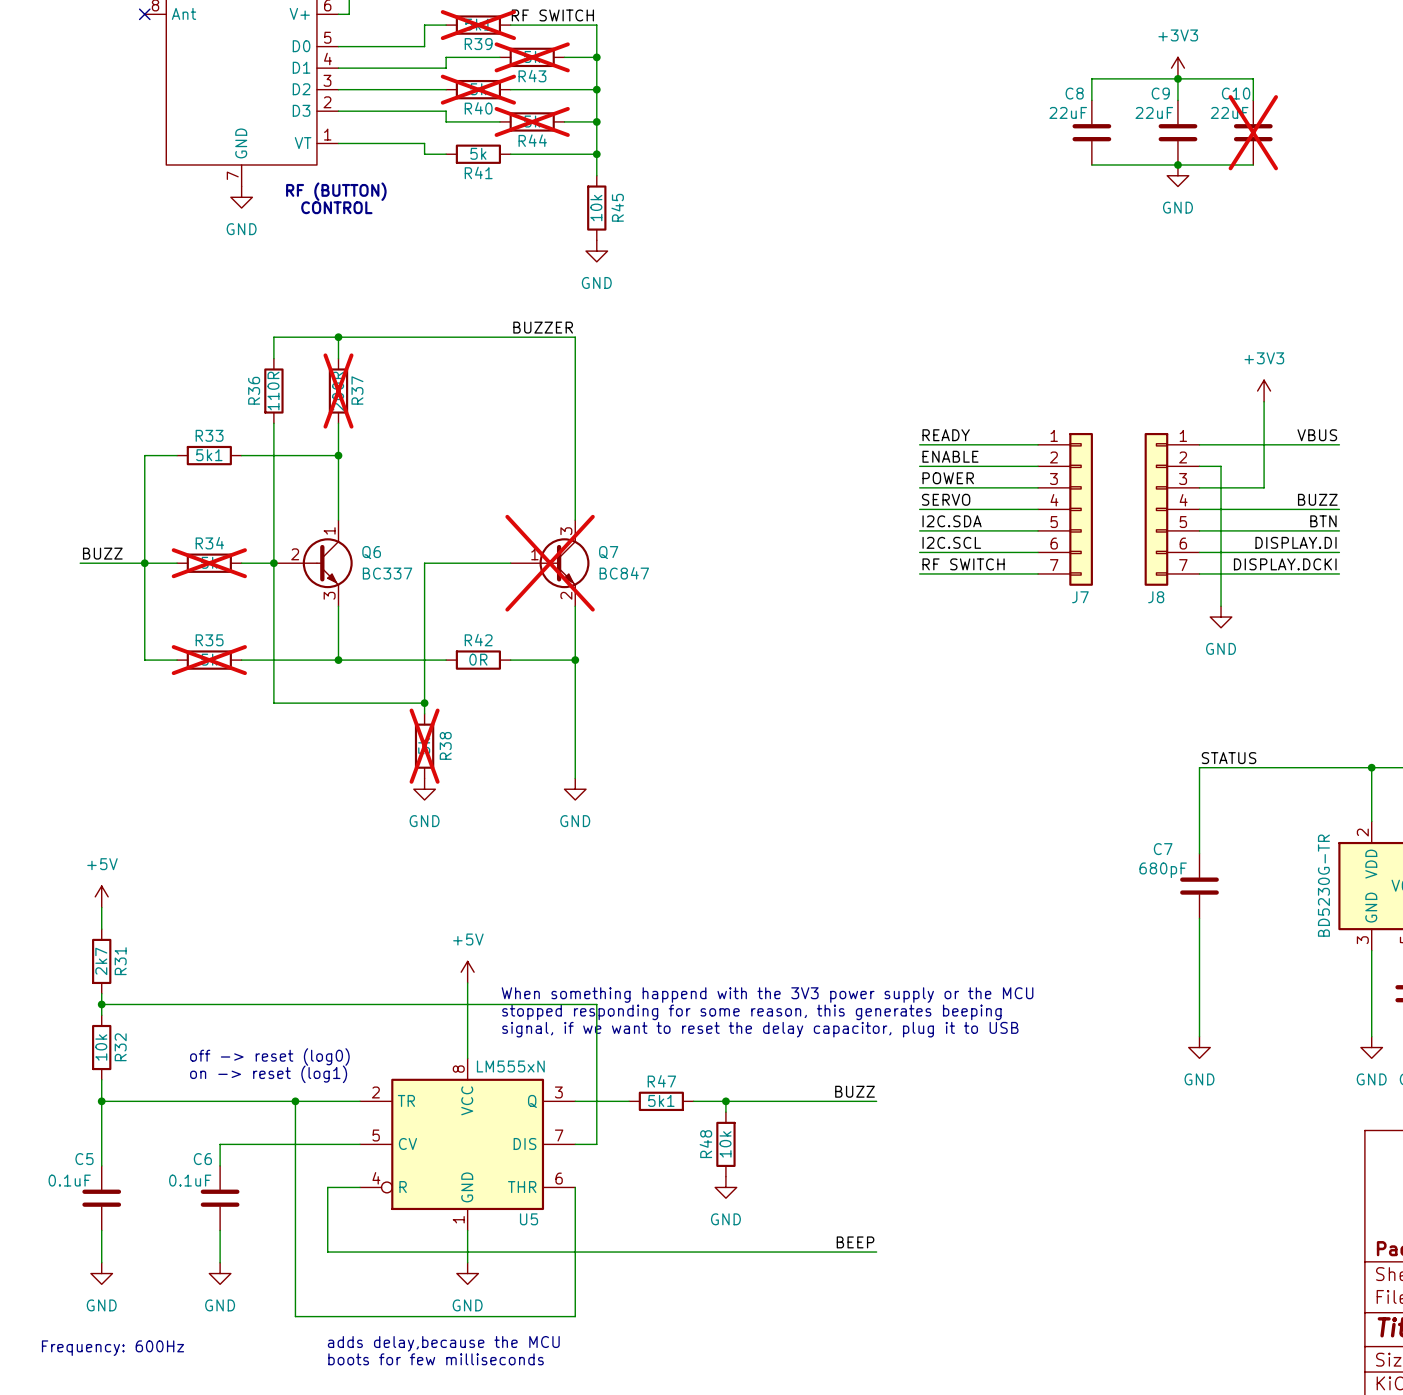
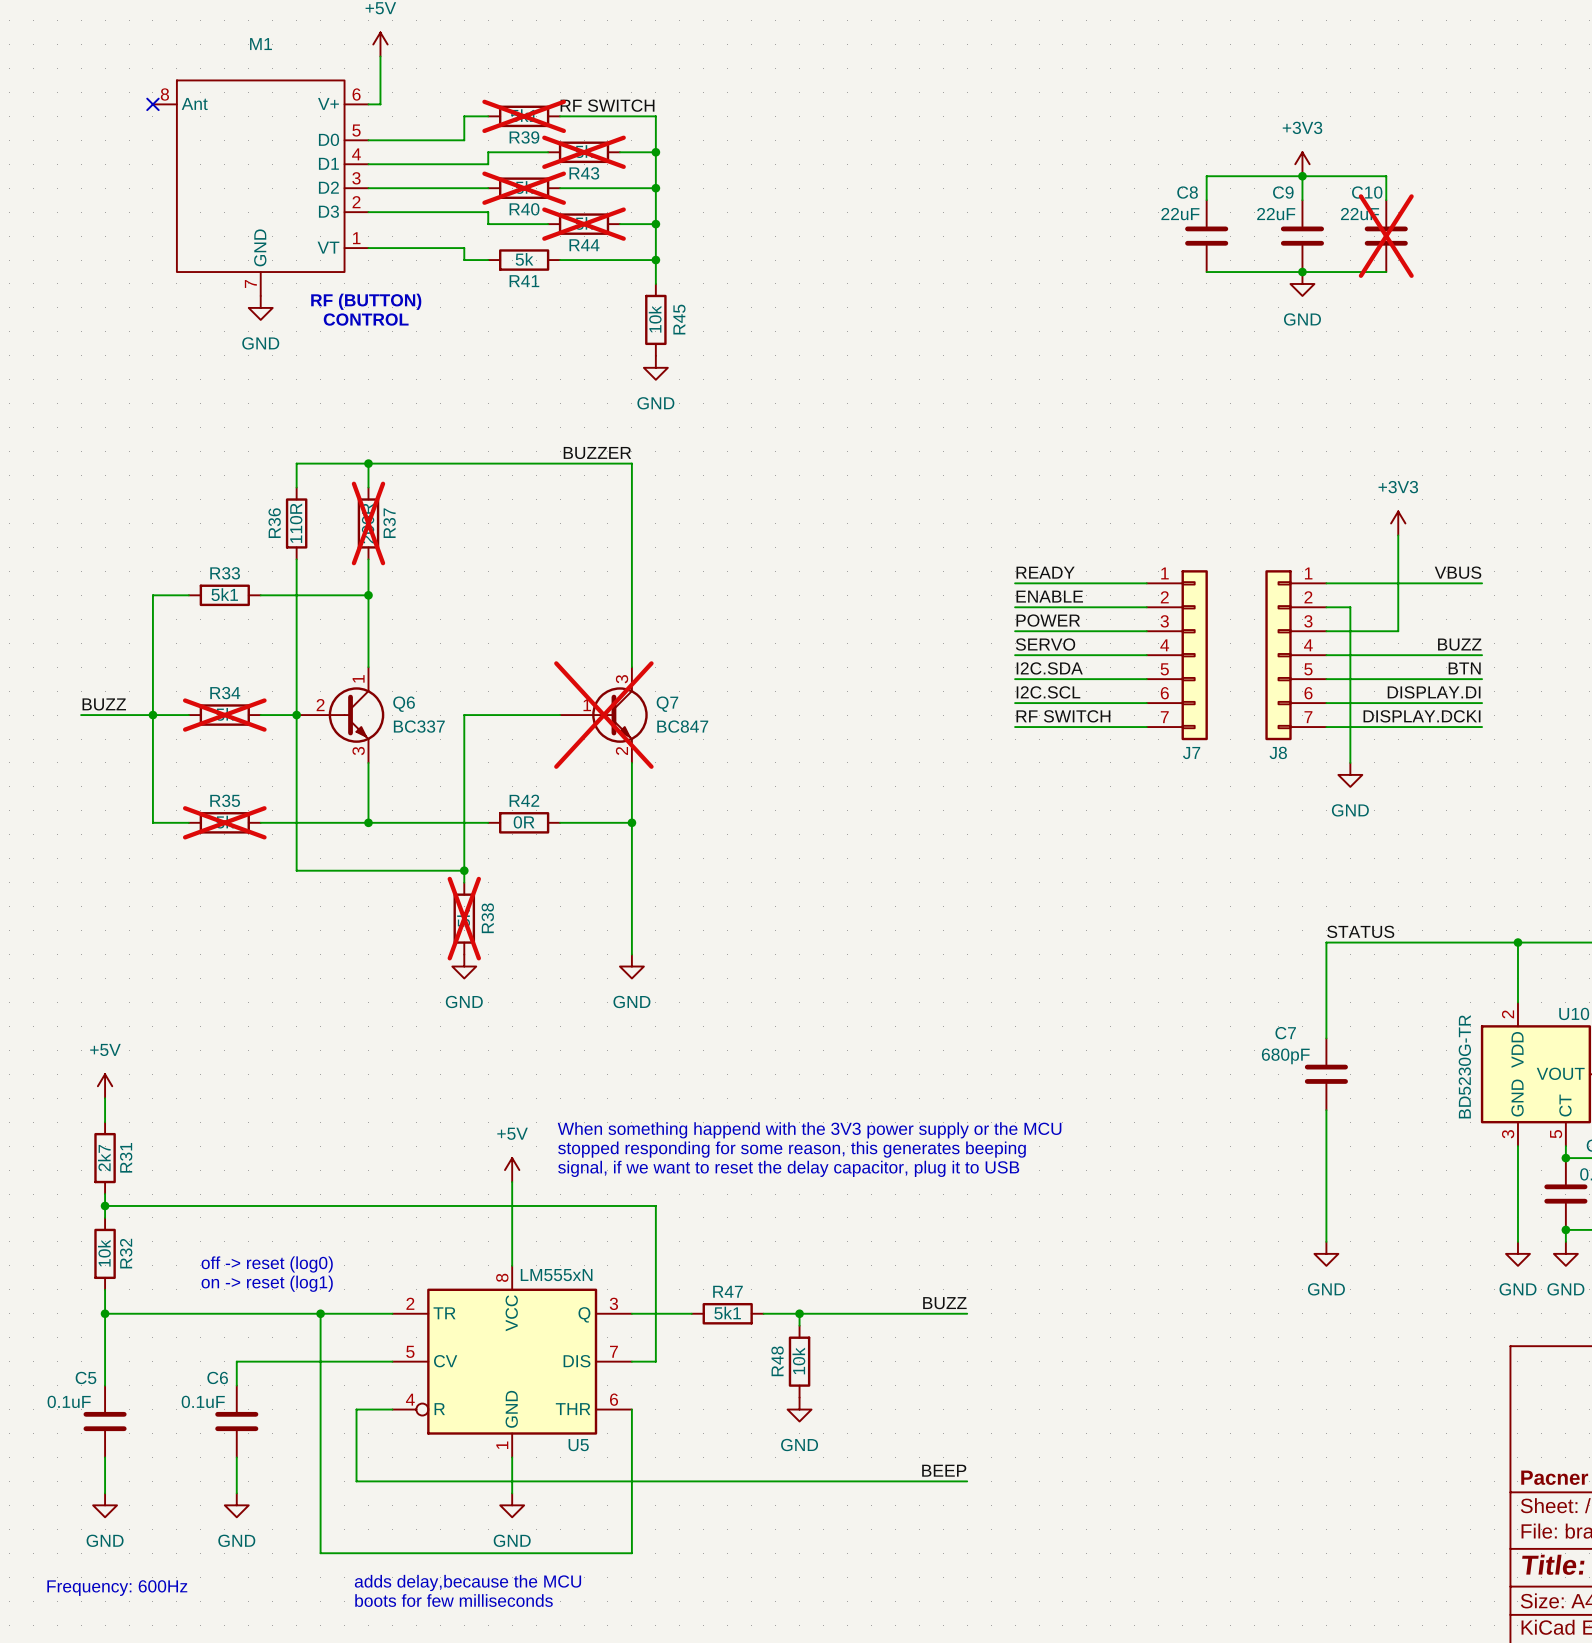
text position: When something happend with the 3V3 power supply or the MCU (767, 995) -> When something happend with the 3V3 power supply or the MCU (809, 1130)
text position: stopped responding for some reason, this generates beeping (751, 1012) -> stopped responding for some reason, this generates beeping (792, 1149)
text position: signal, if we want to reset the delay capacitor, plug it to USB (760, 1029) -> signal, if we want to reset the delay capacitor, plug it to USB (788, 1168)

